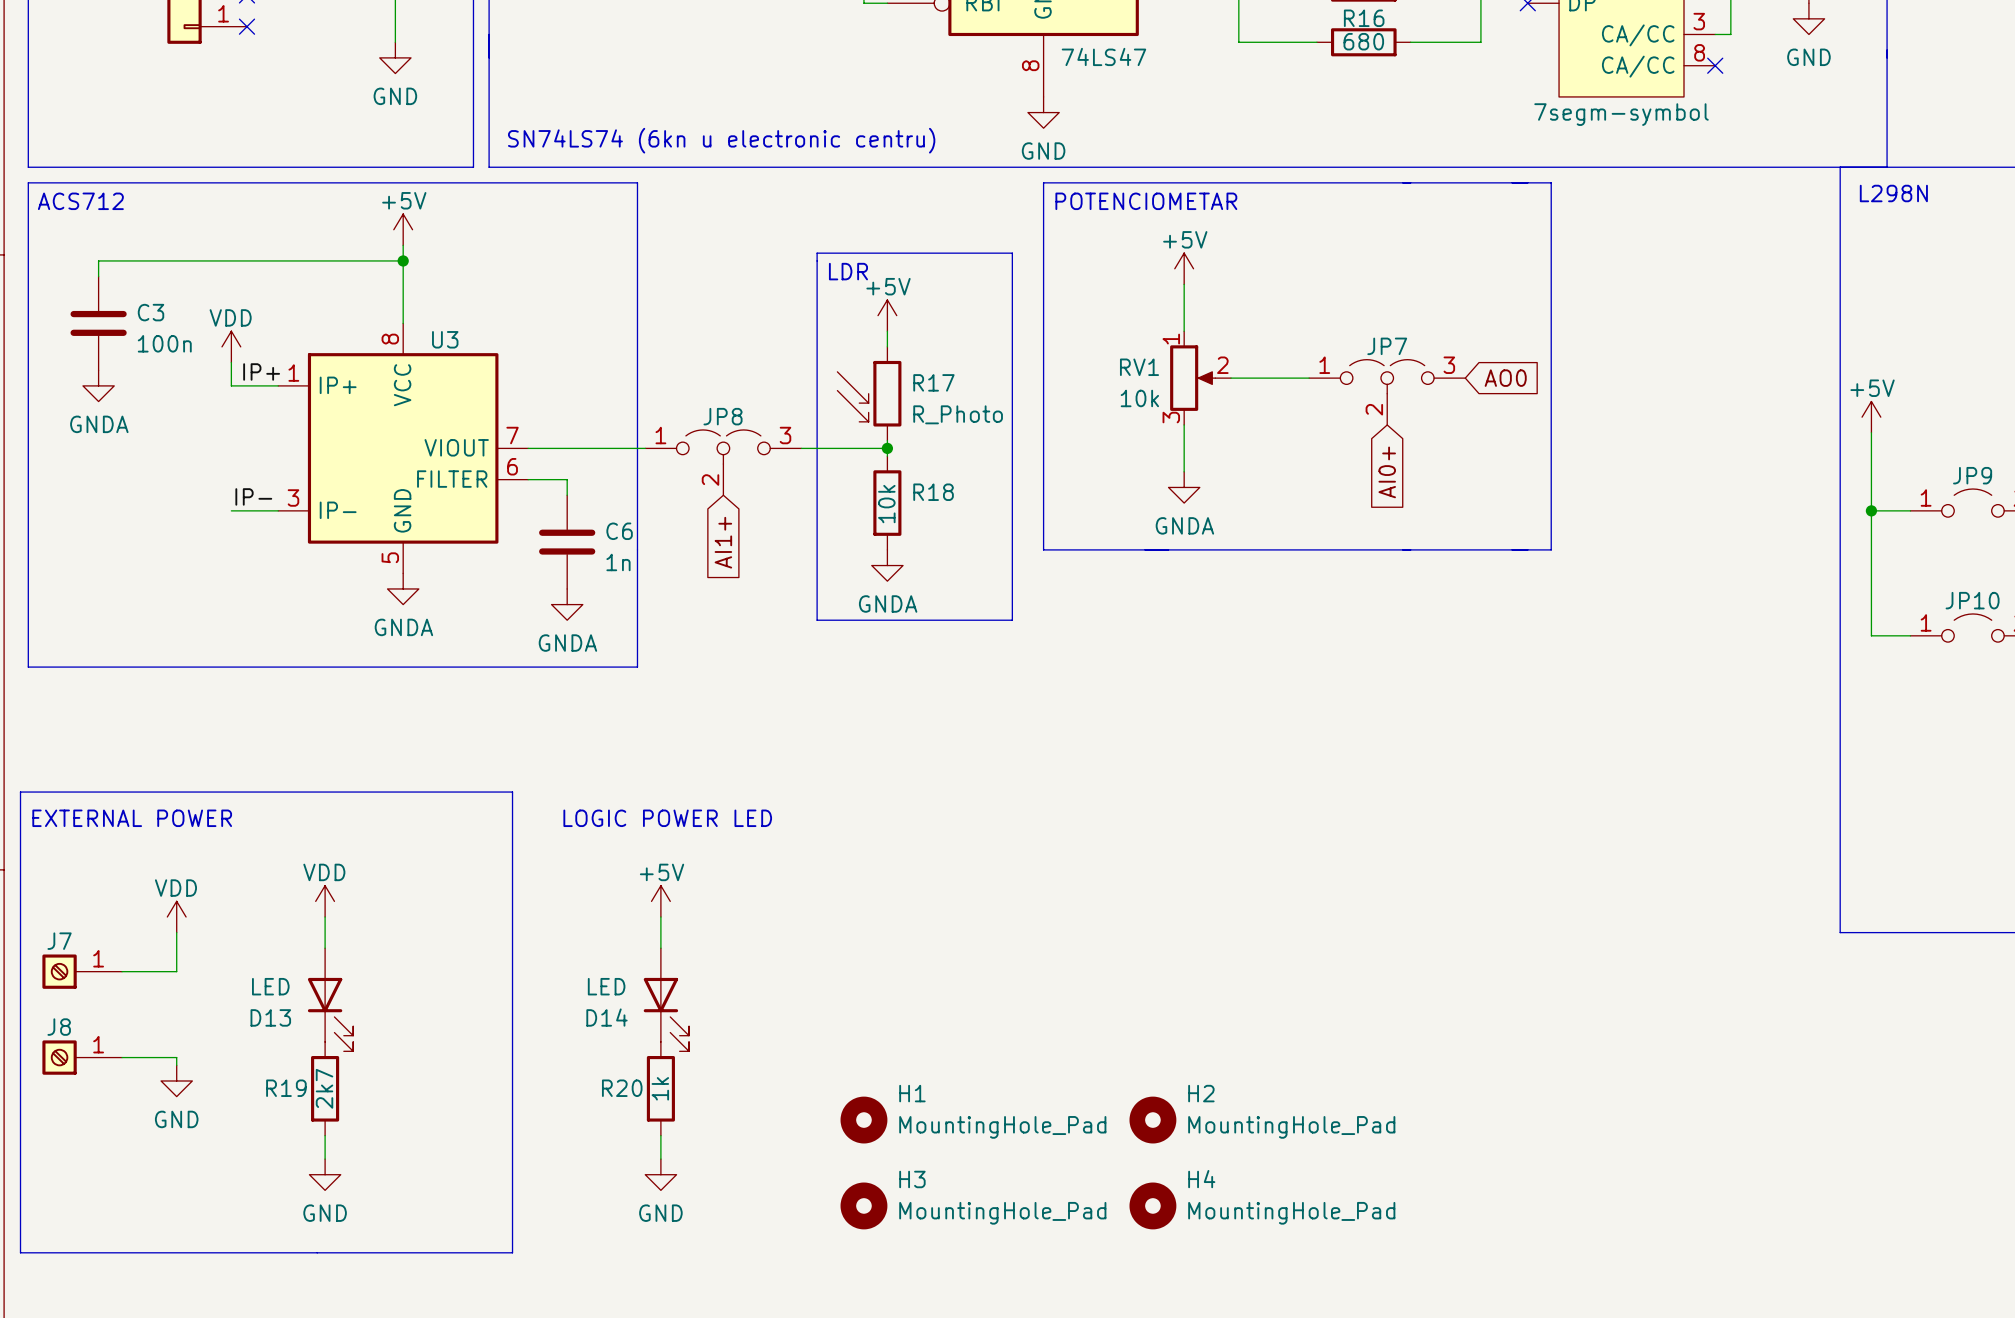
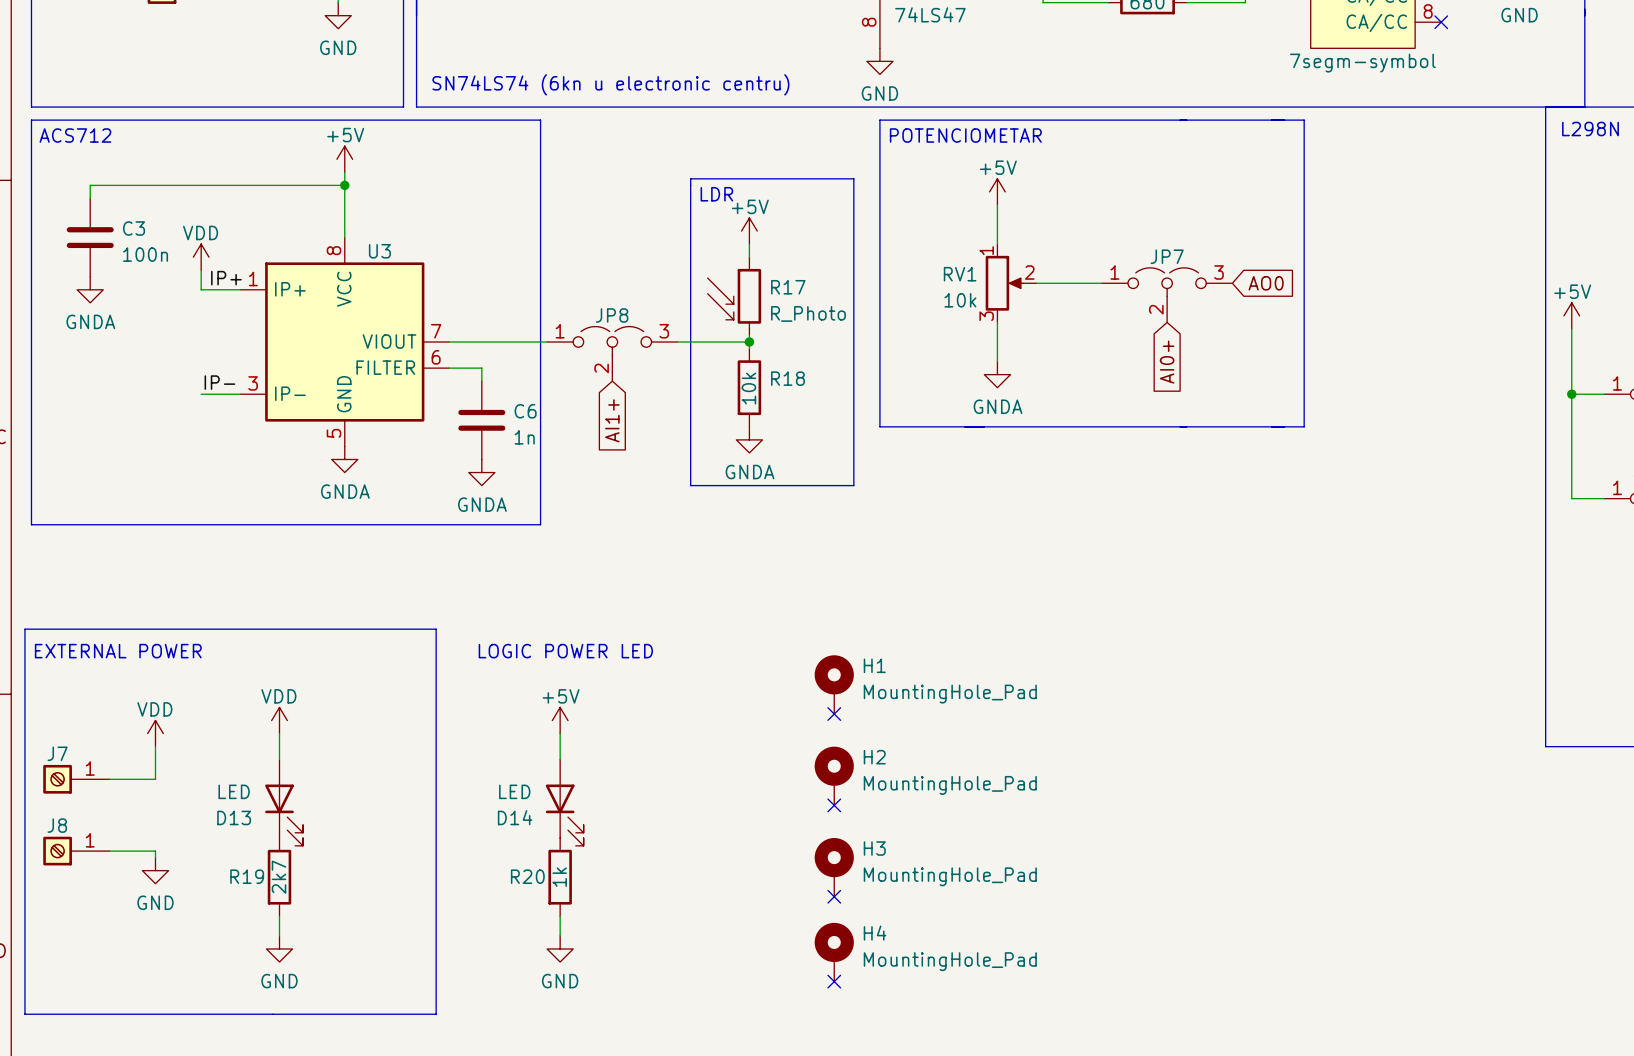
no-connect mark: none -> (834, 714)
no-connect mark: none -> (834, 805)
H1 symbol: [840, 1096, 888, 1144] -> [814, 655, 854, 715]
H2 symbol: [1129, 1096, 1177, 1144] -> [814, 746, 854, 806]
no-connect mark: none -> (834, 896)
H3 symbol: [840, 1182, 888, 1230] -> [814, 838, 854, 897]
H4 symbol: [1129, 1182, 1177, 1230] -> [814, 922, 854, 982]
no-connect mark: none -> (834, 981)

